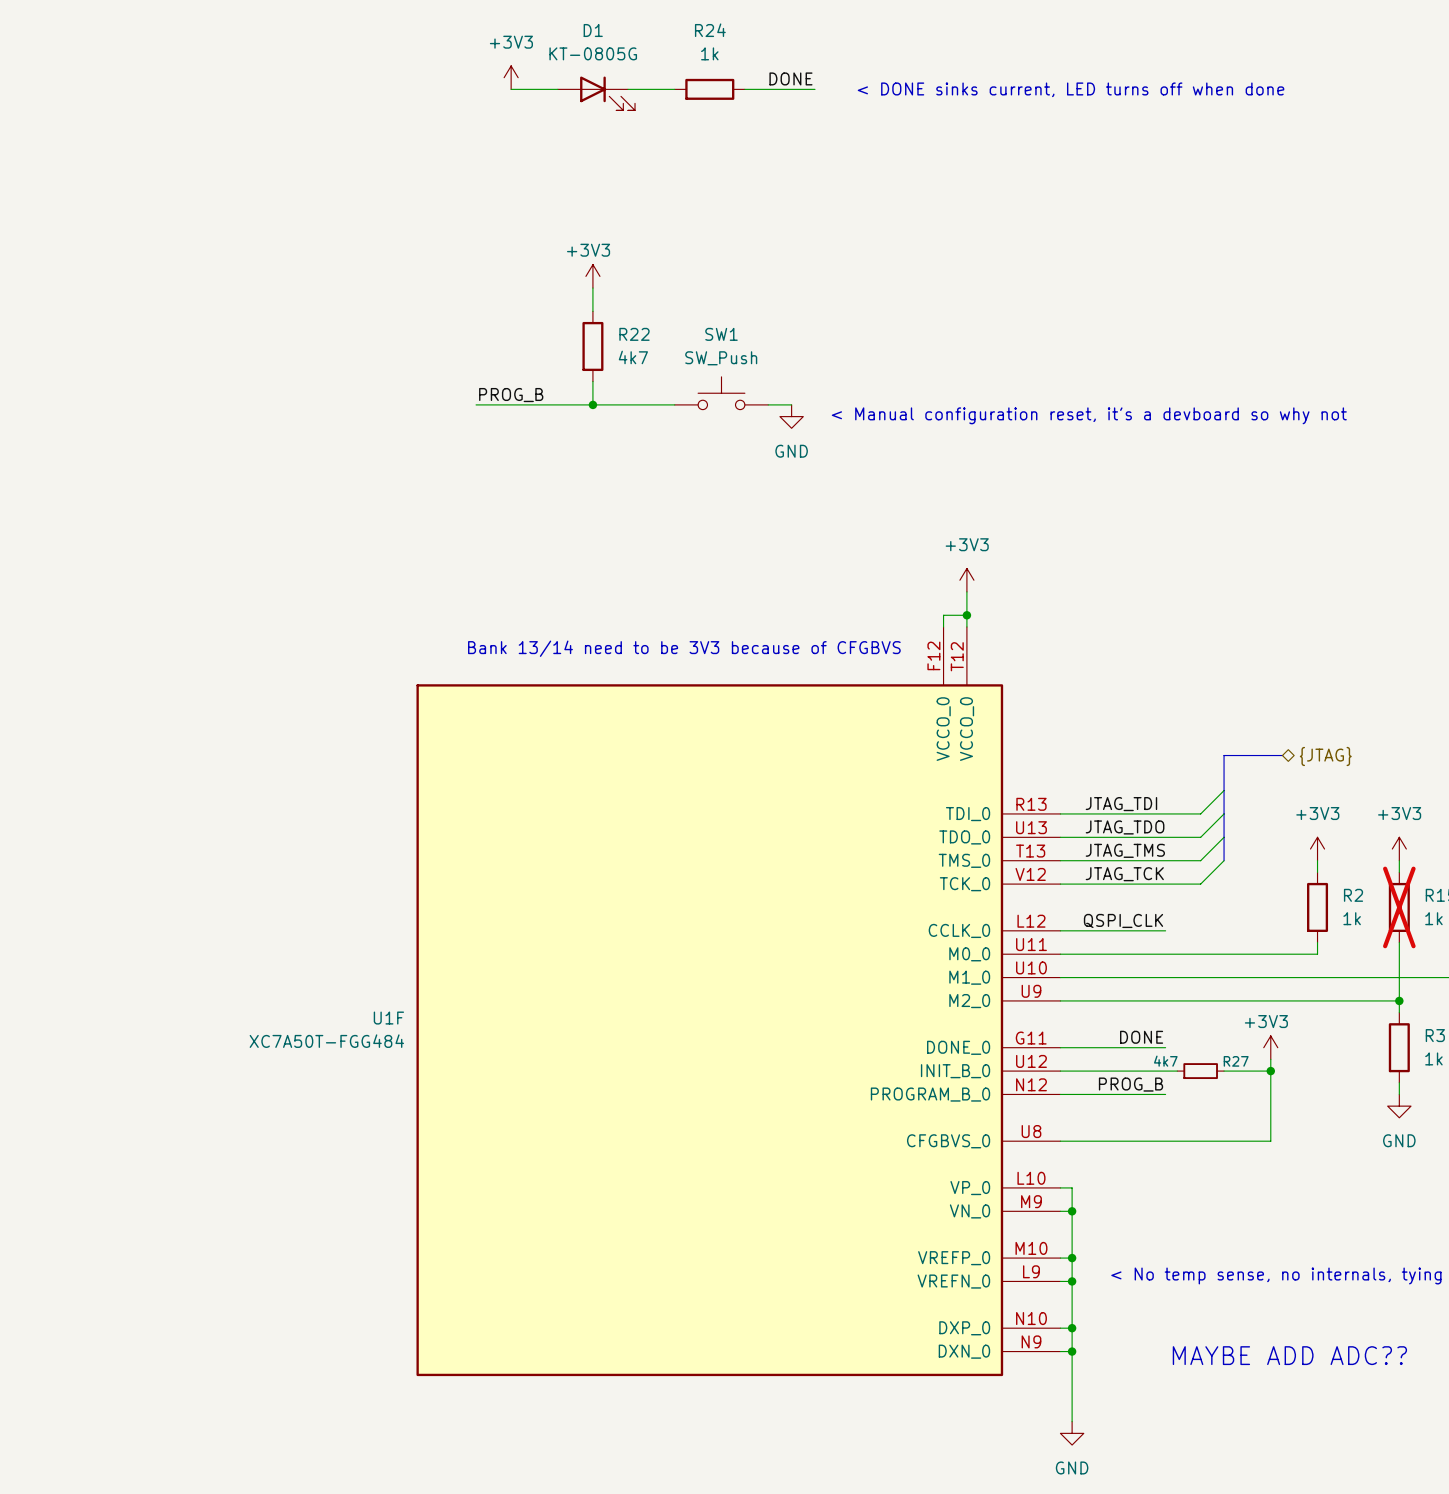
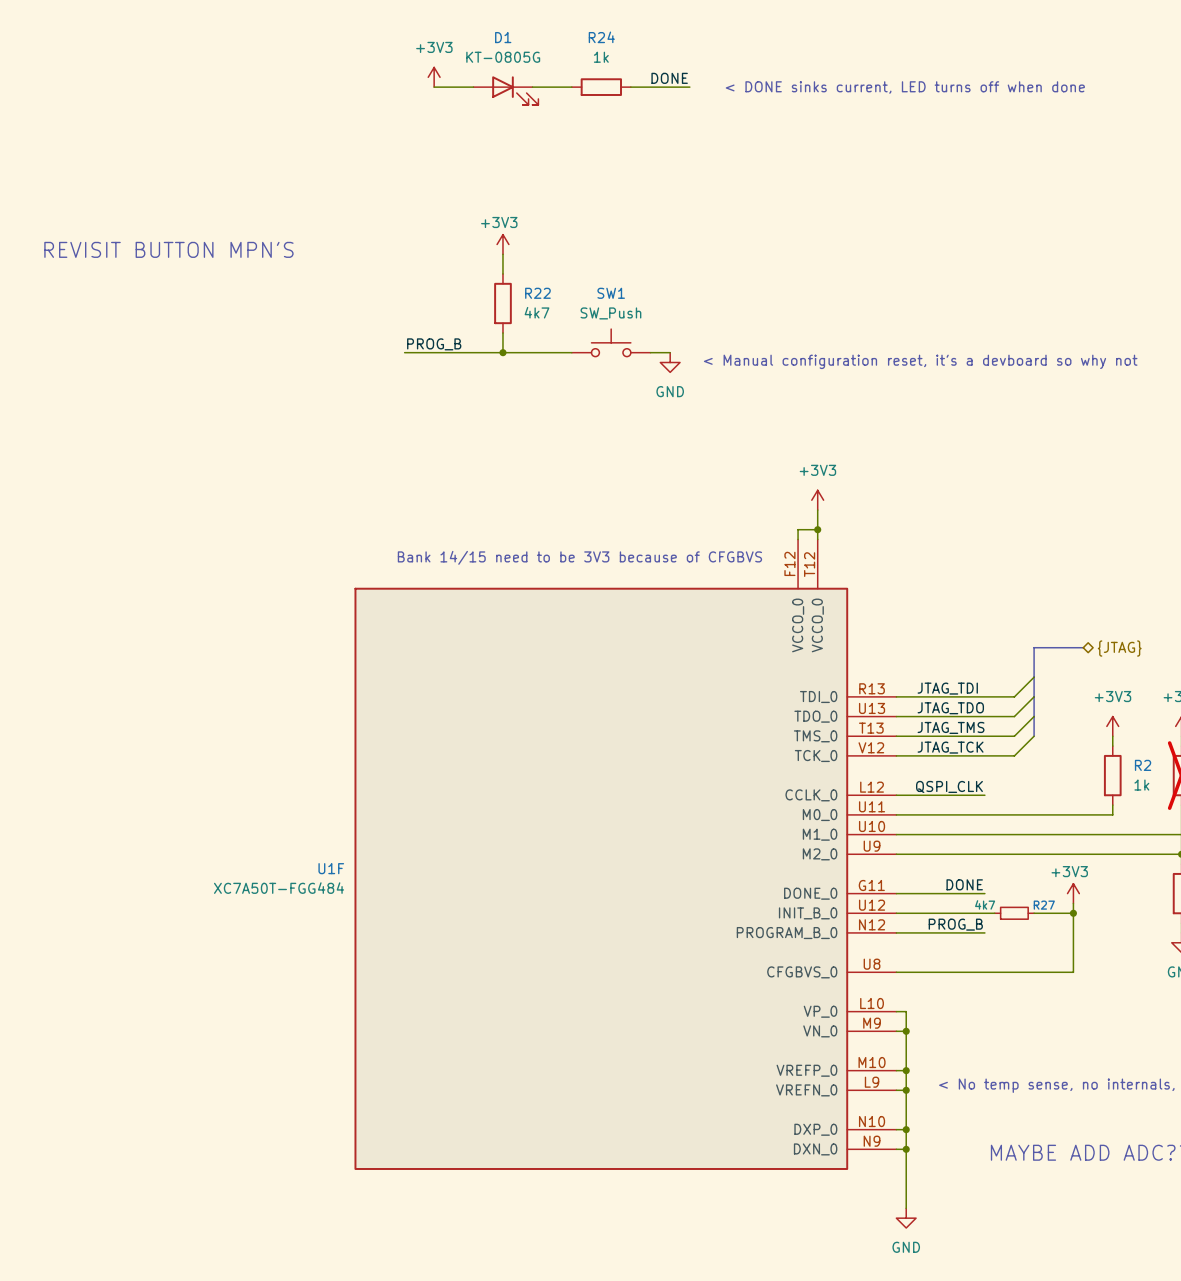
text: none -> REVISIT BUTTON MPN'S (168, 249)
text: Bank 13/14 need to be 3V3 because of CFGBVS (684, 648) -> Bank 14/15 need to be 3V3 because of CFGBVS (579, 557)

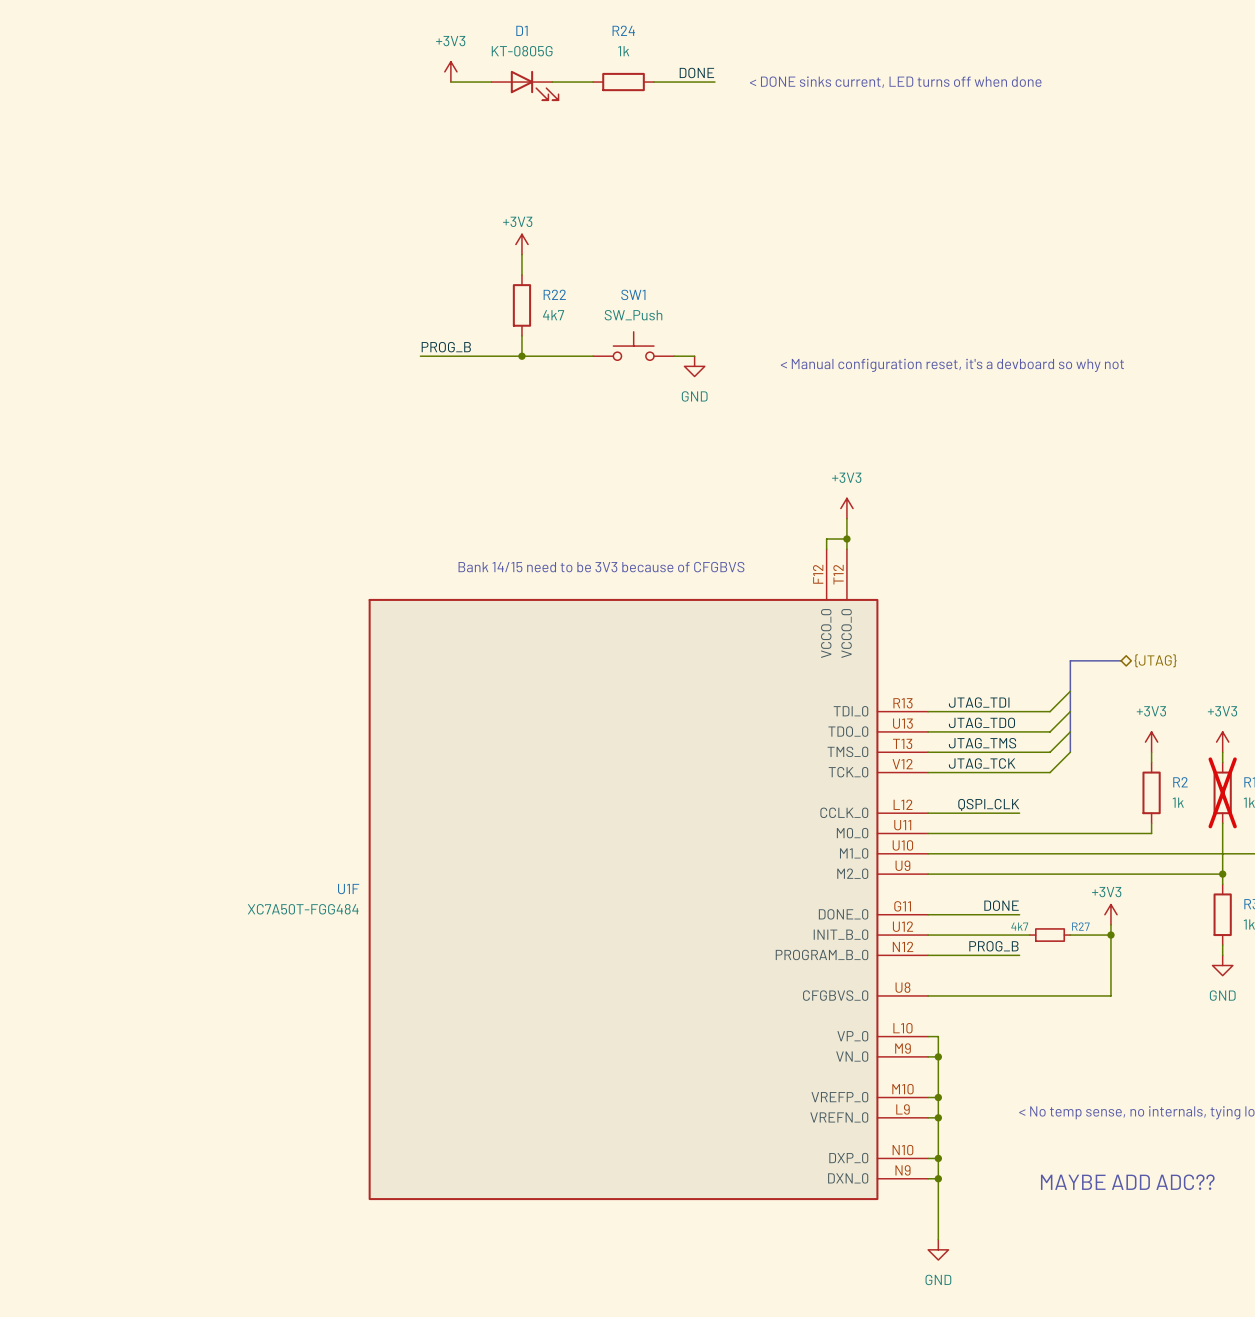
text: REVISIT BUTTON MPN'S (168, 249) -> none

